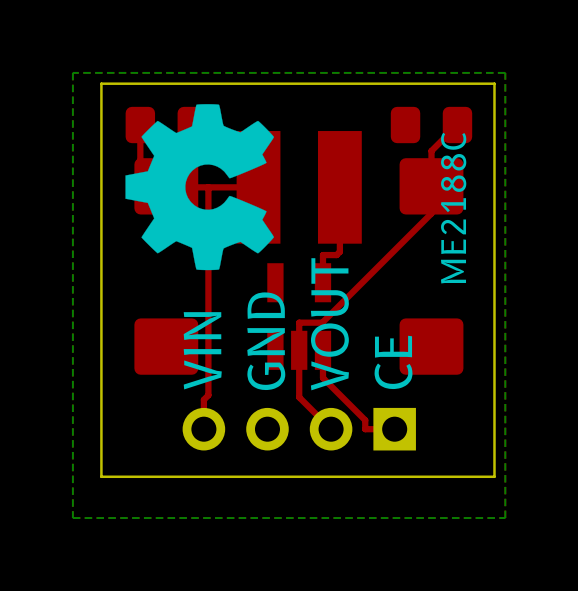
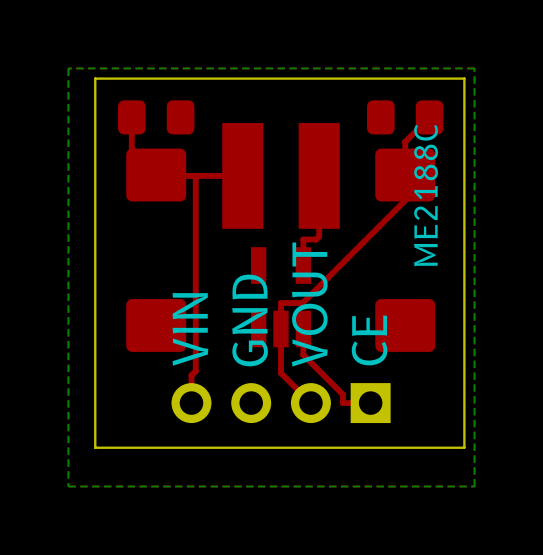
drawing: [125, 104, 274, 271] -> none

